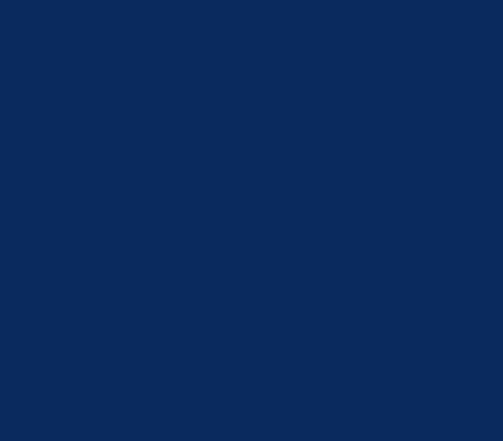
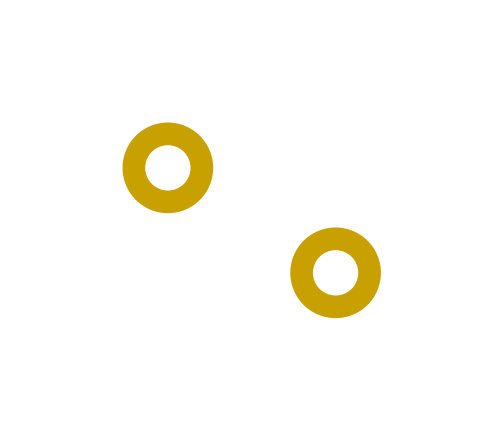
part: none -> (167, 167)
part: none -> (335, 272)

